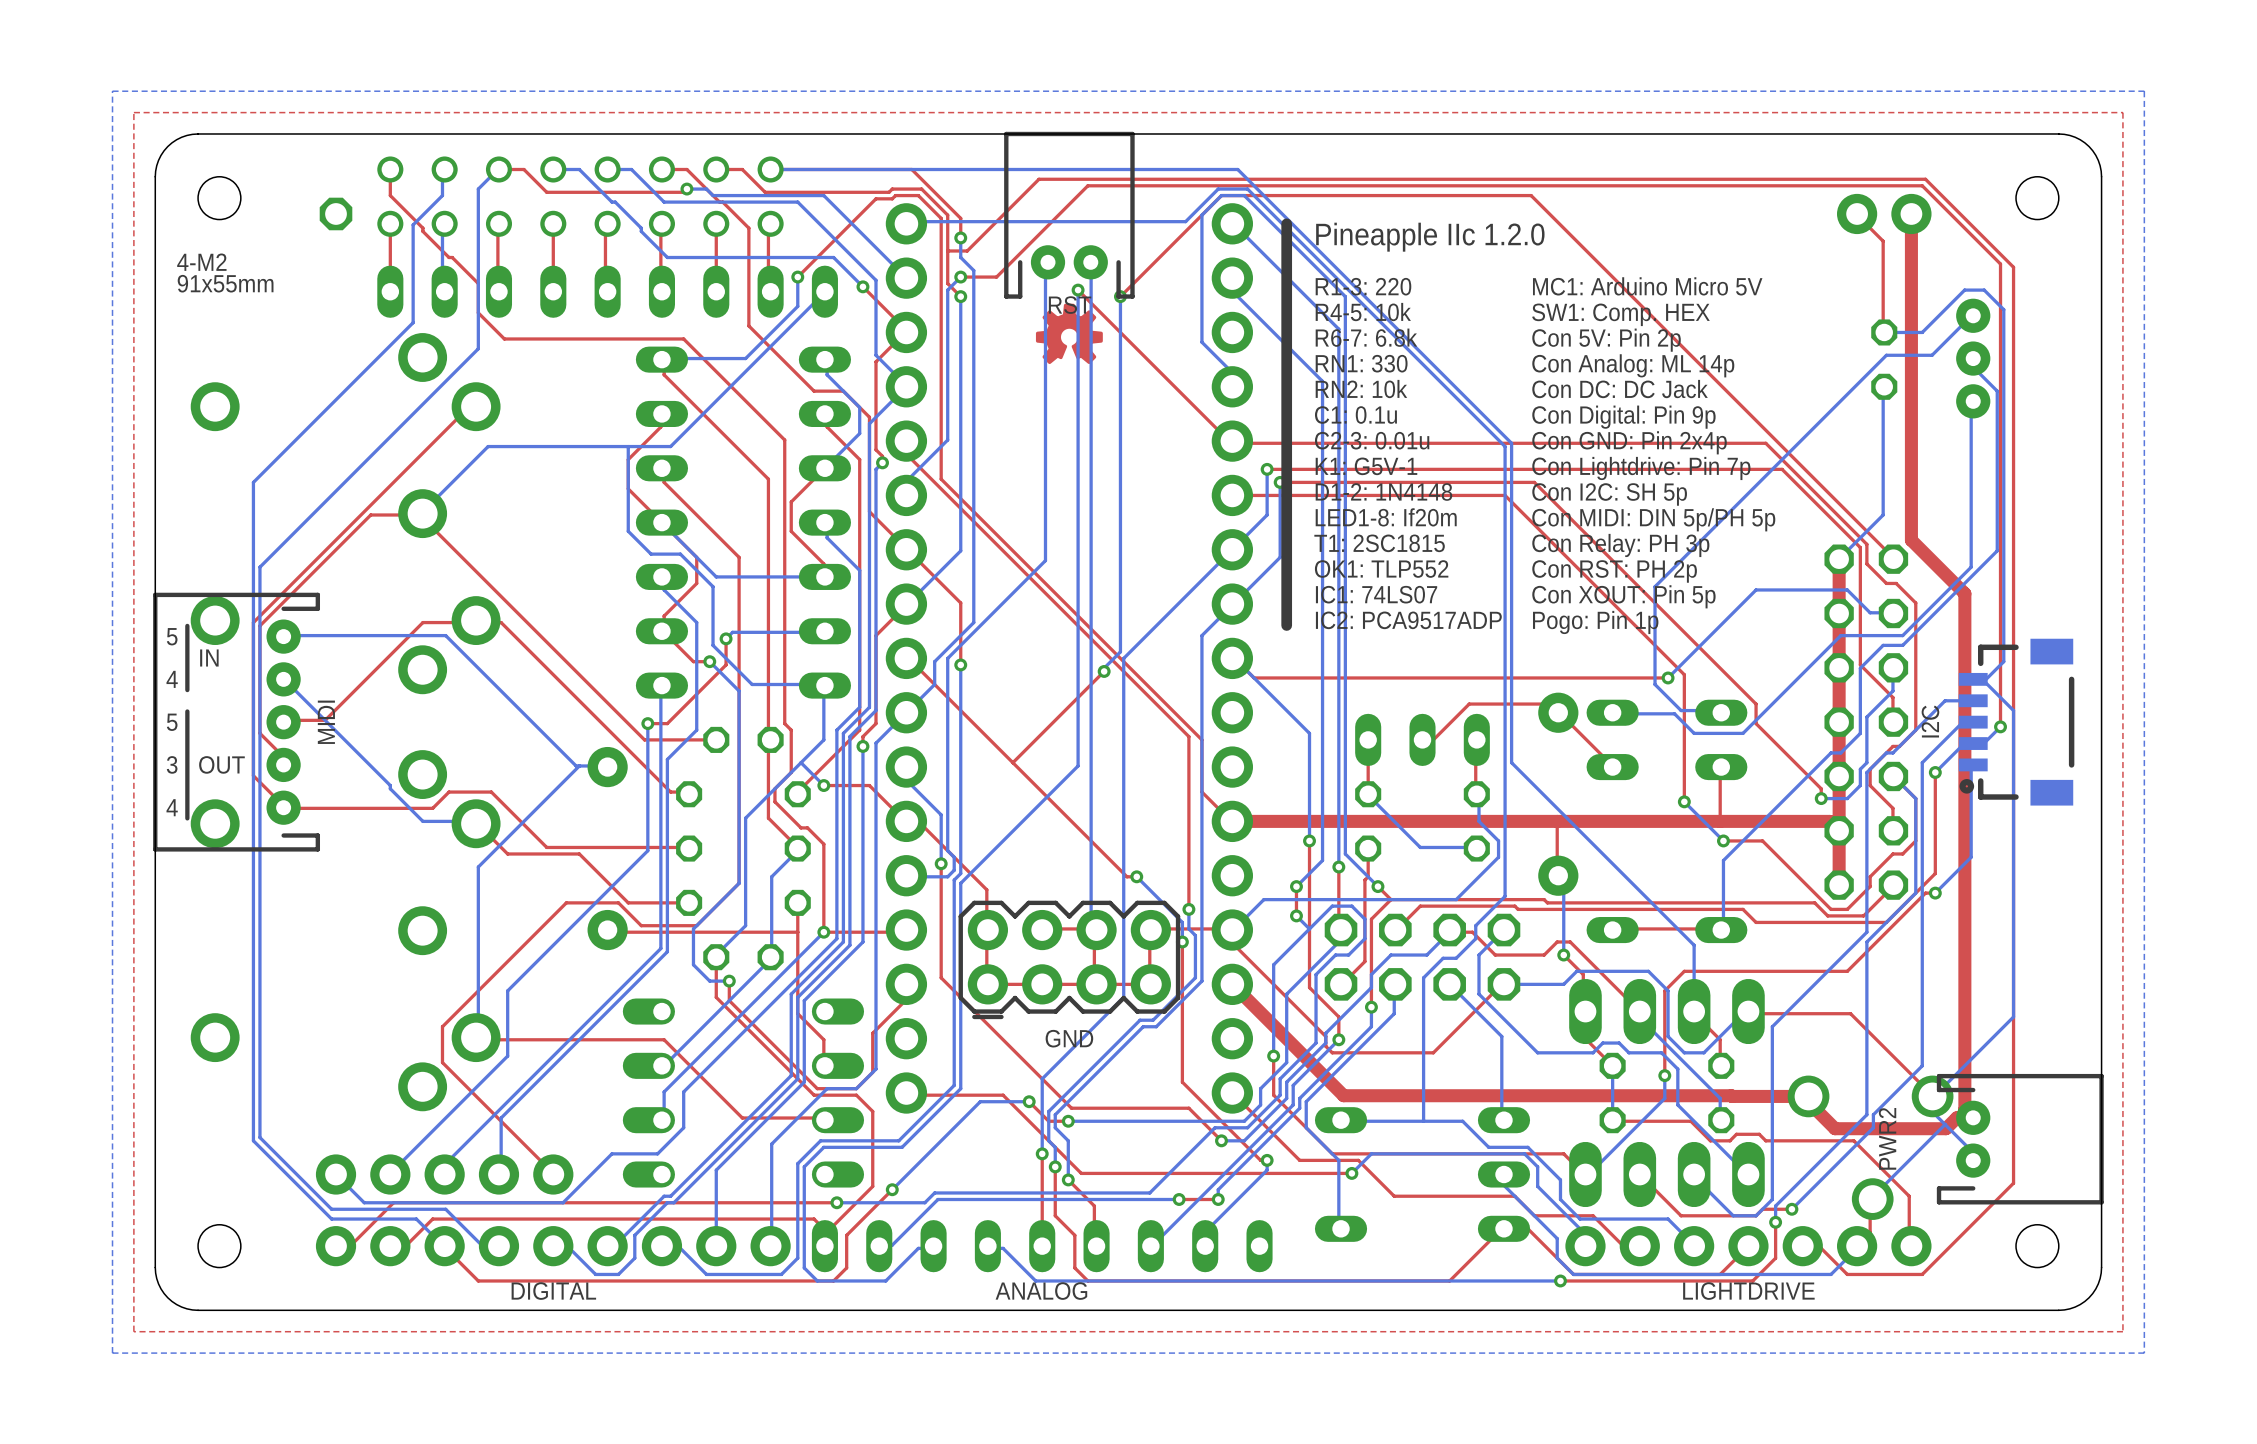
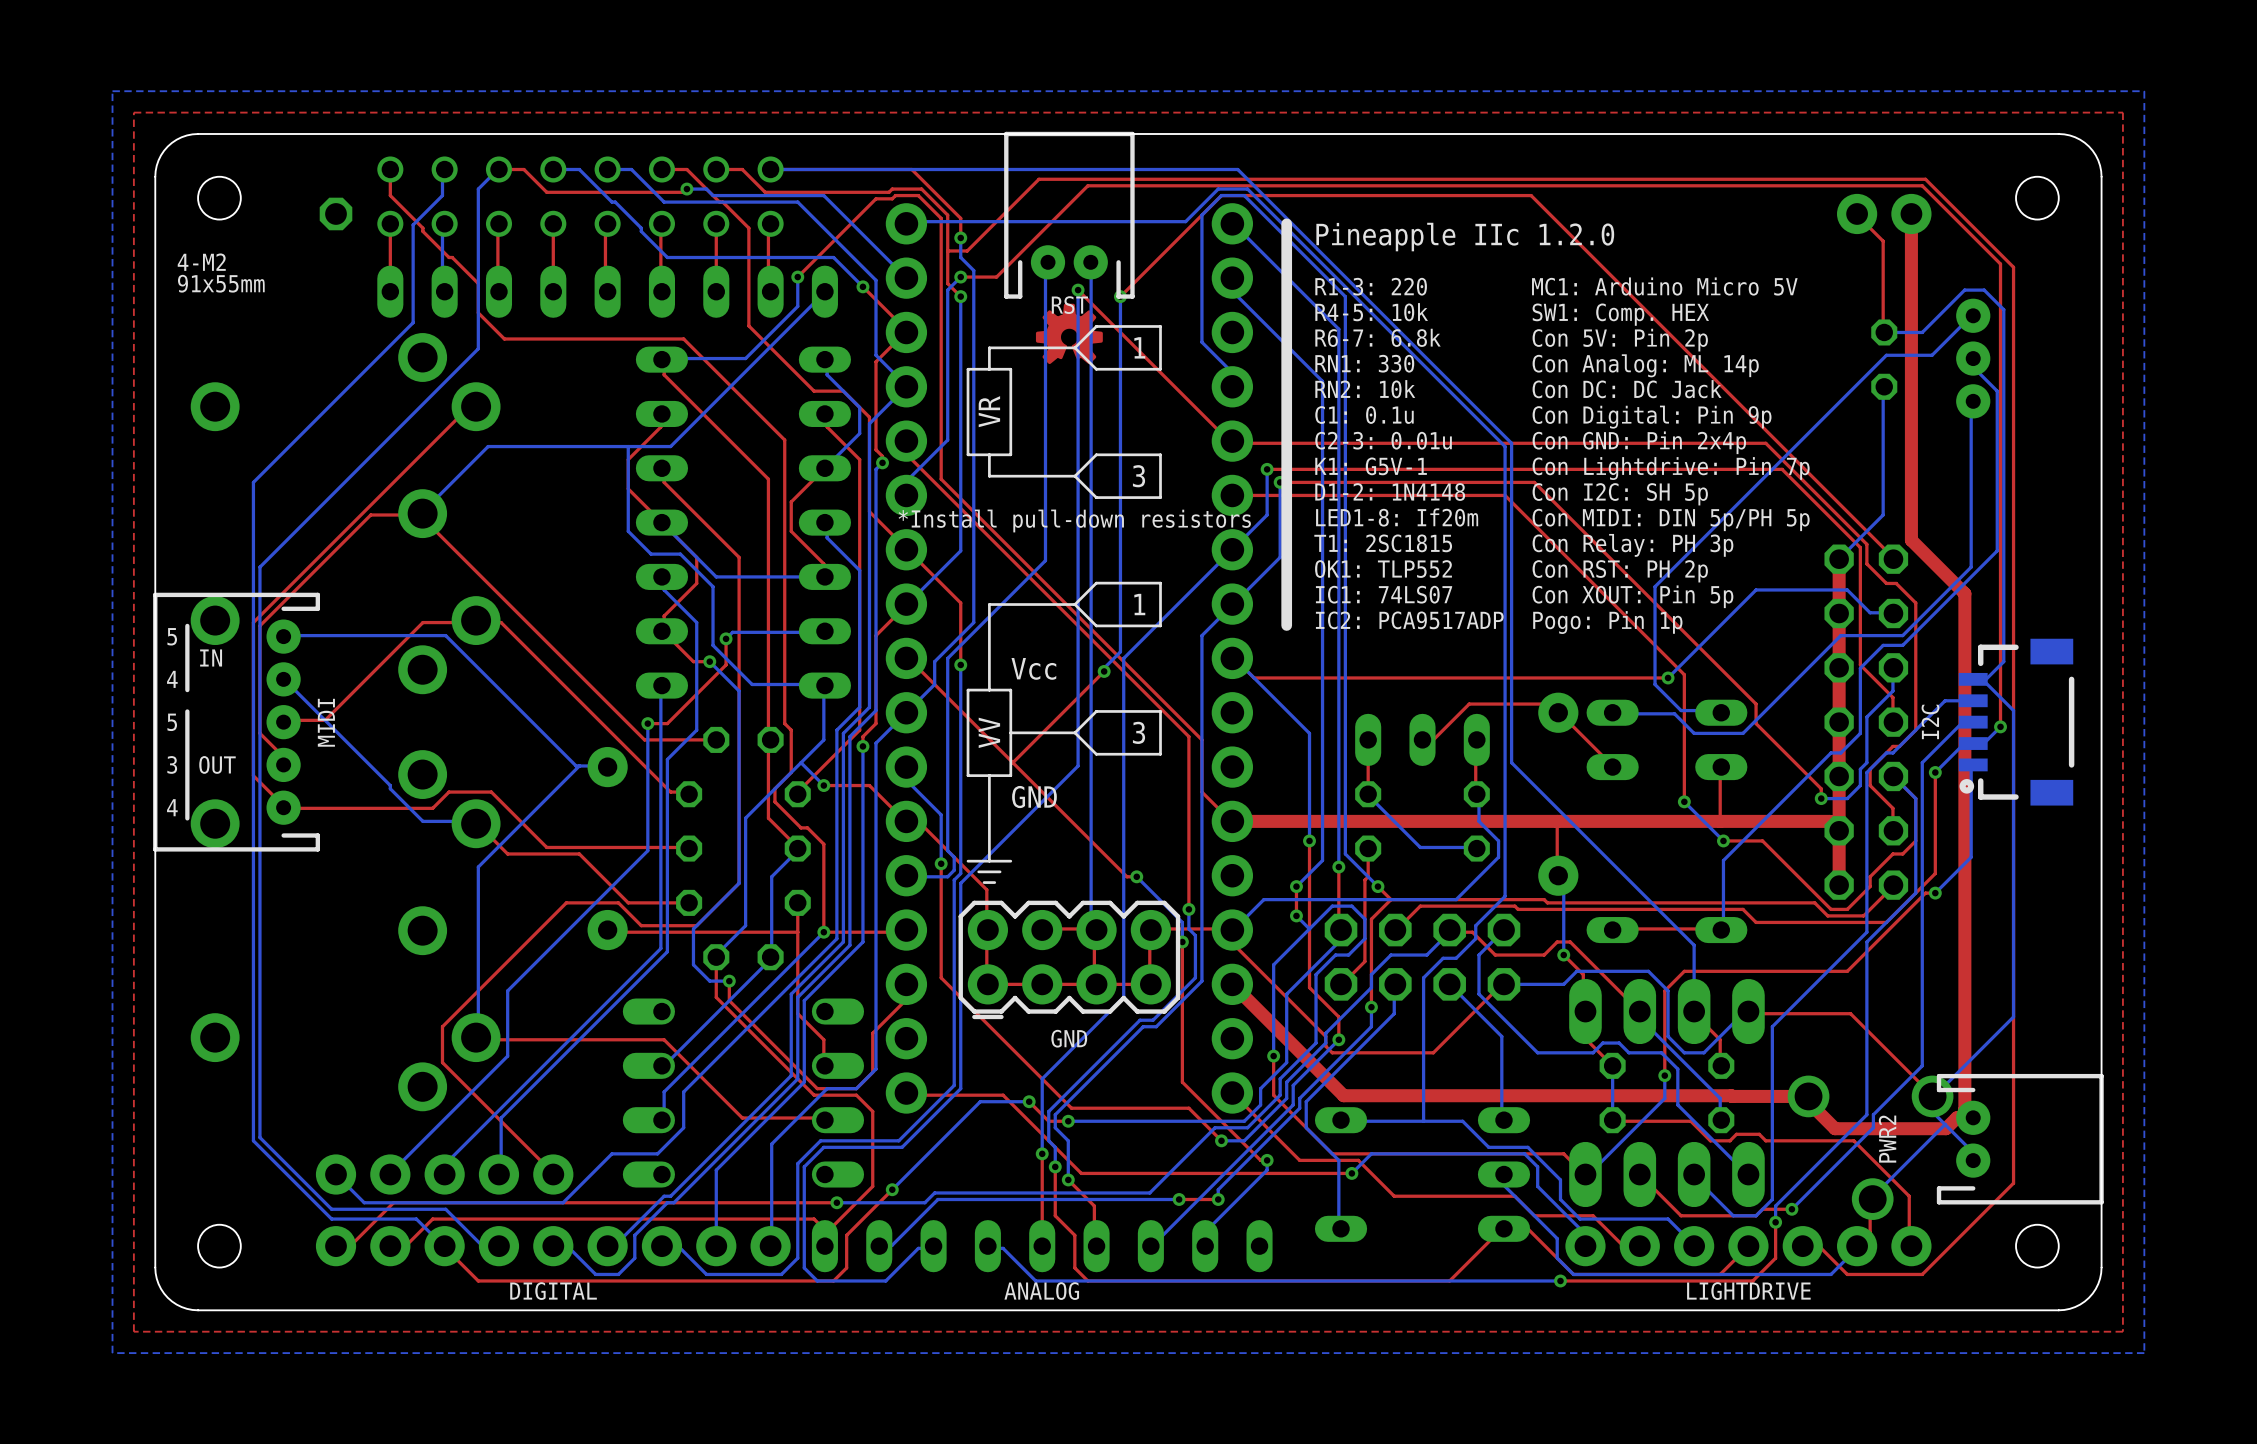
drawing: none -> [966, 325, 1162, 884]

